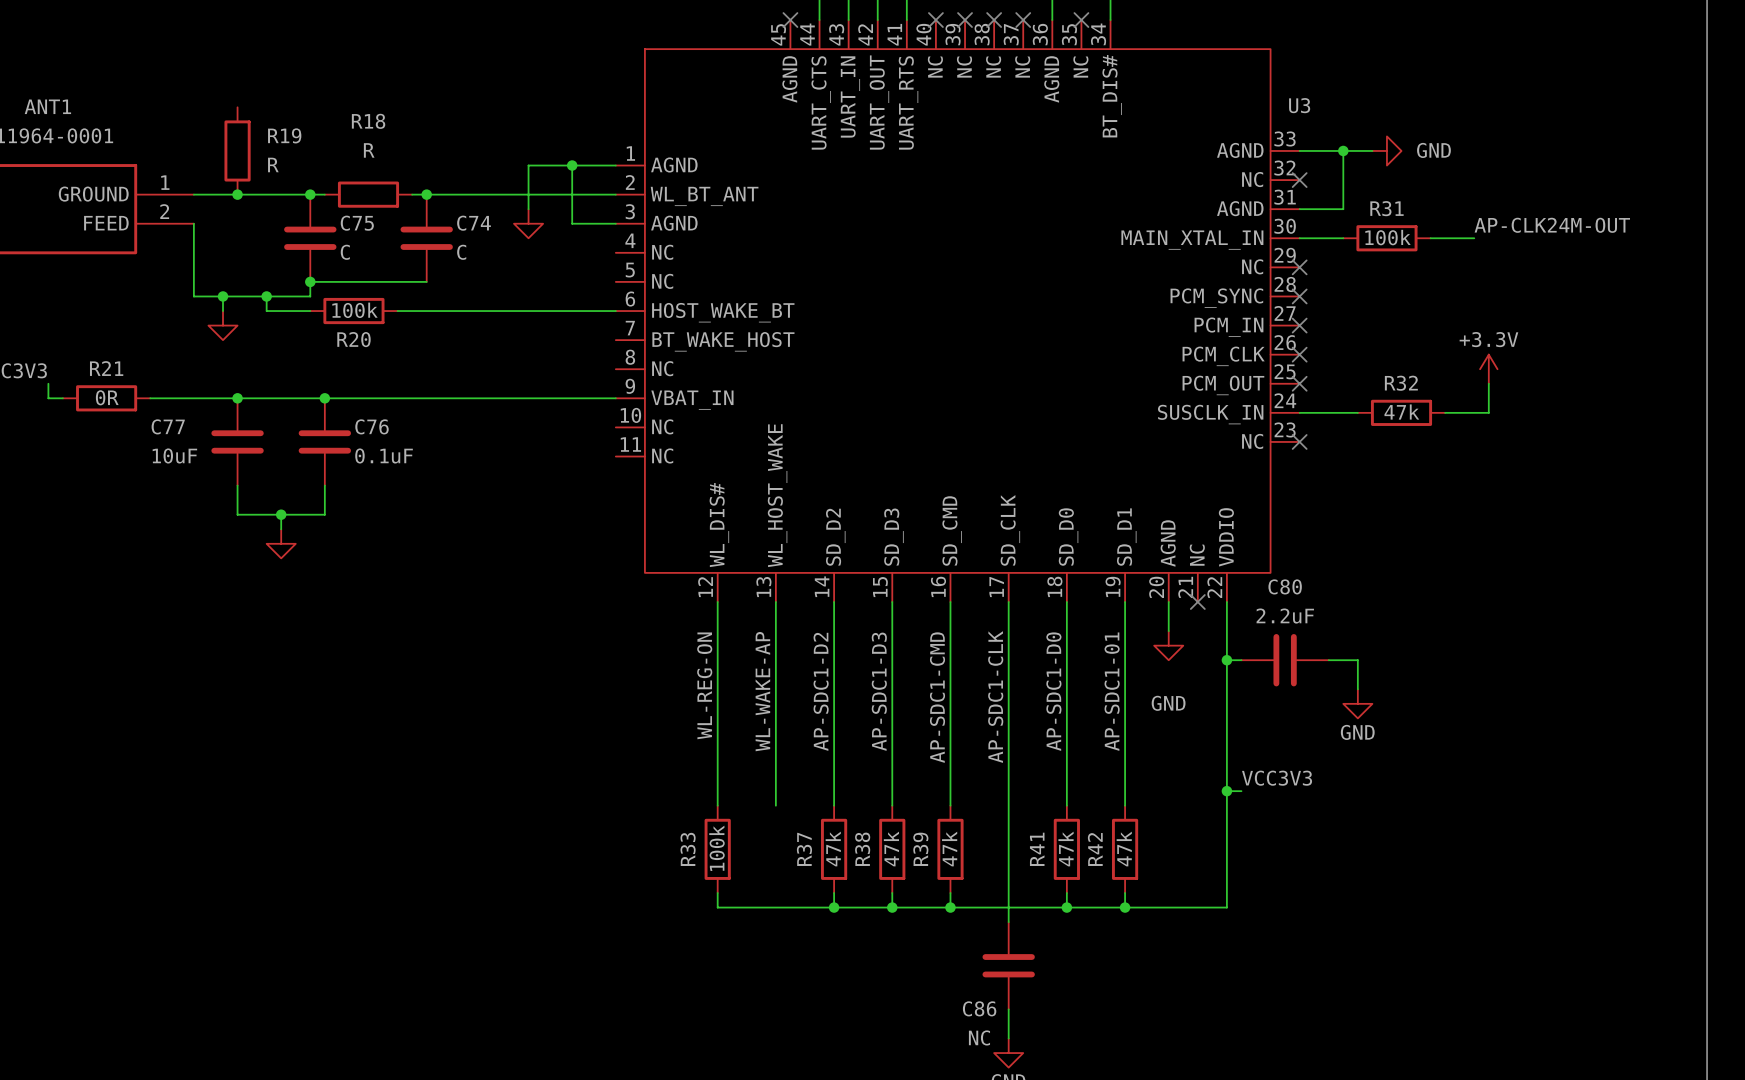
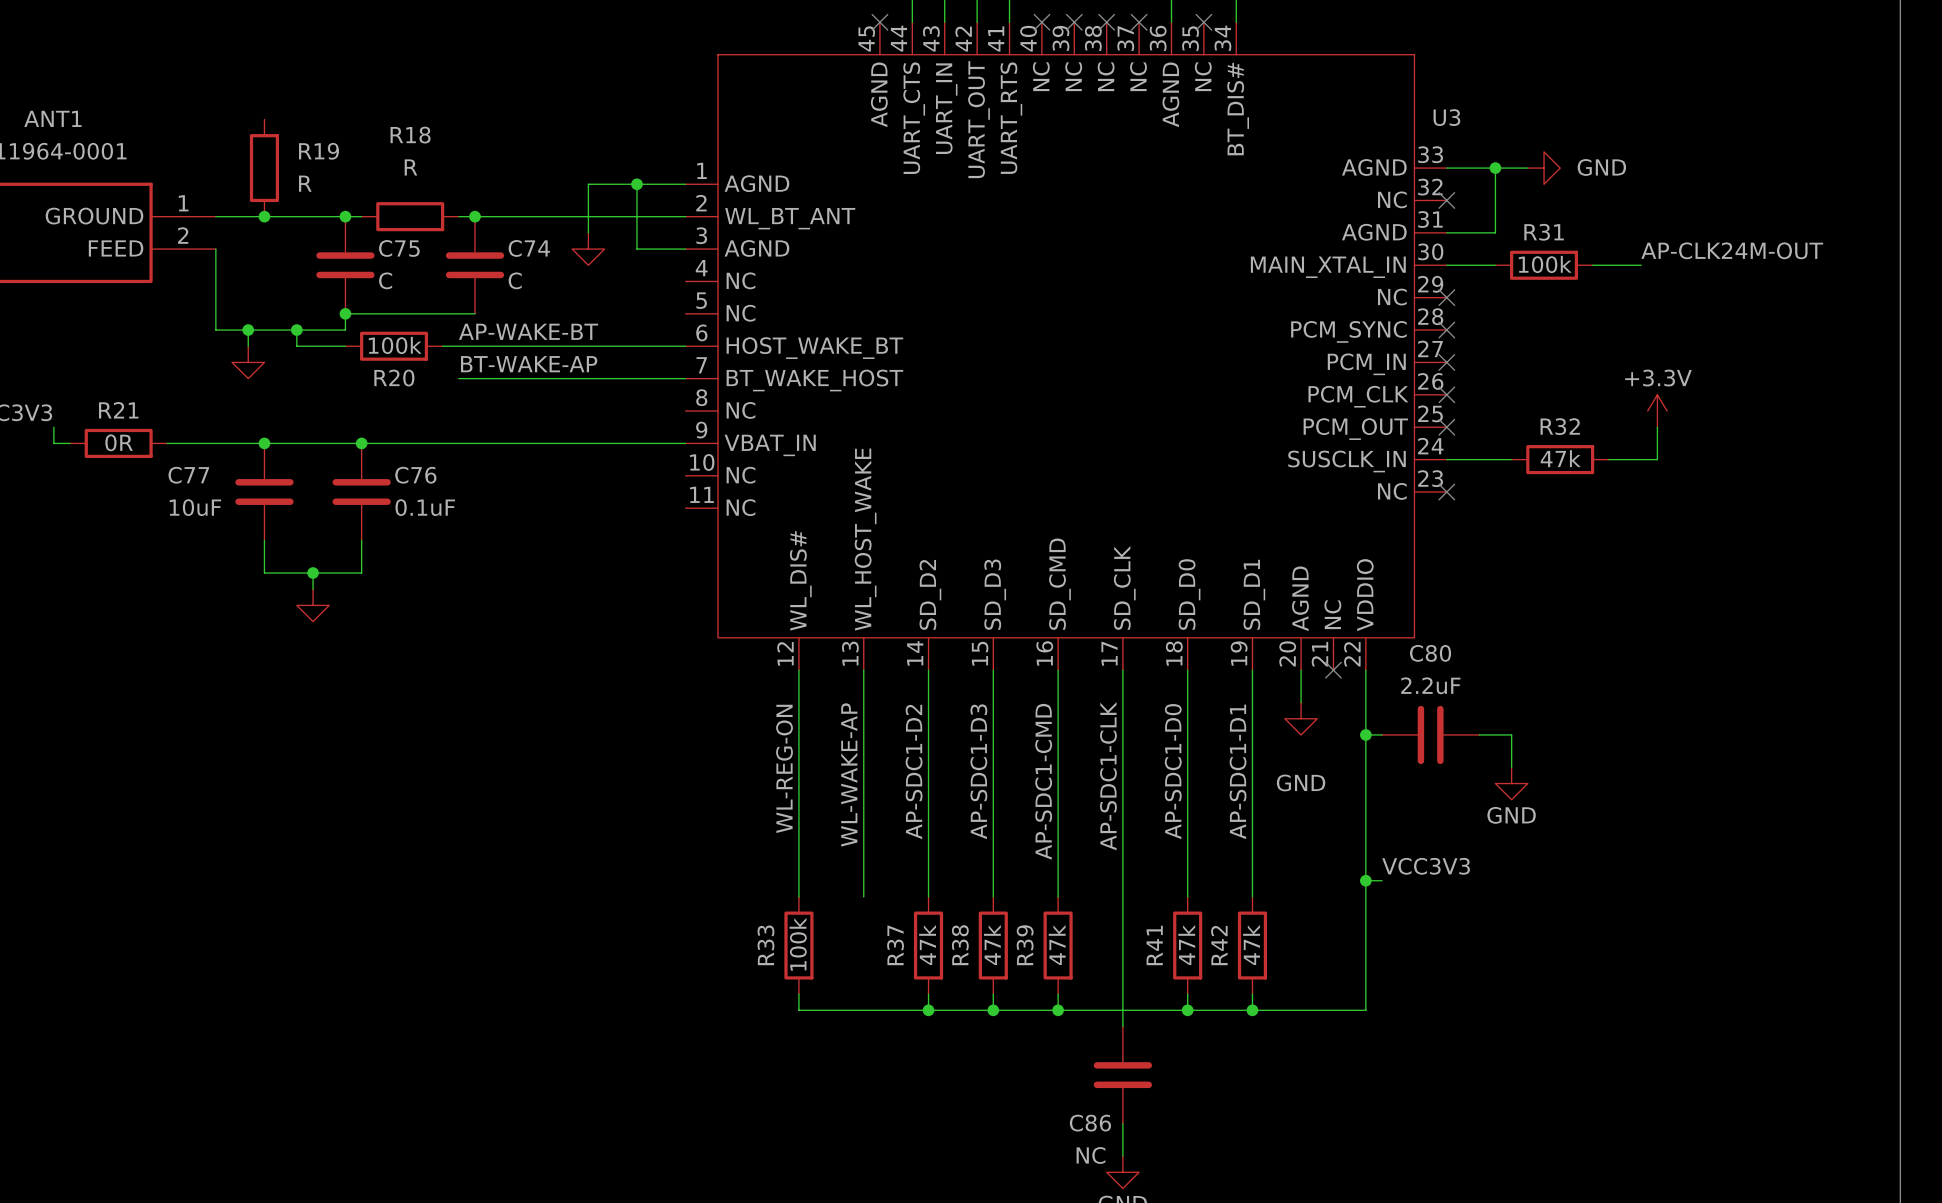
label: none -> AP-WAKE-BT (528, 331)
label: none -> BT-WAKE-AP (529, 364)
wire: none -> (458, 378) (685, 378)
label: AP-SDC1-01 (1112, 691) -> AP-SDC1-D1 (1238, 771)

